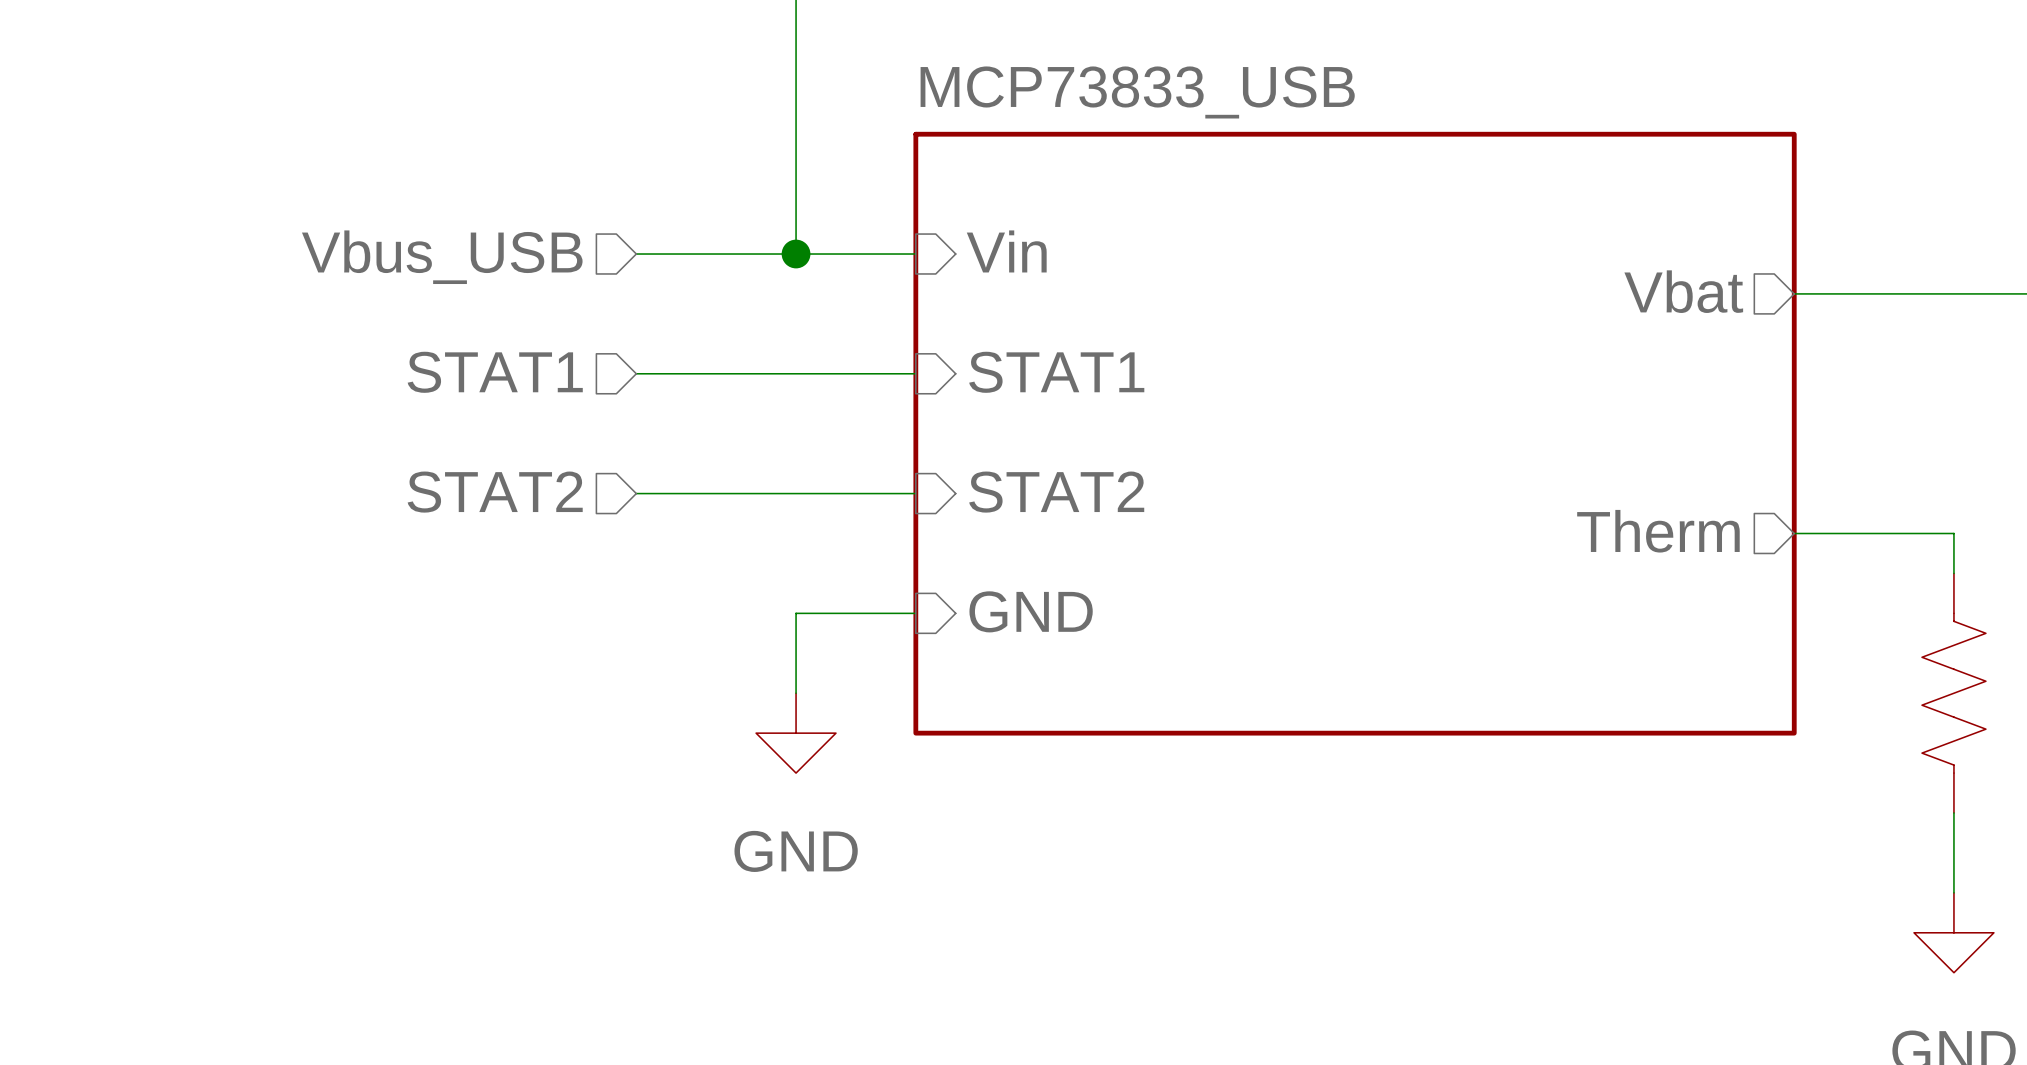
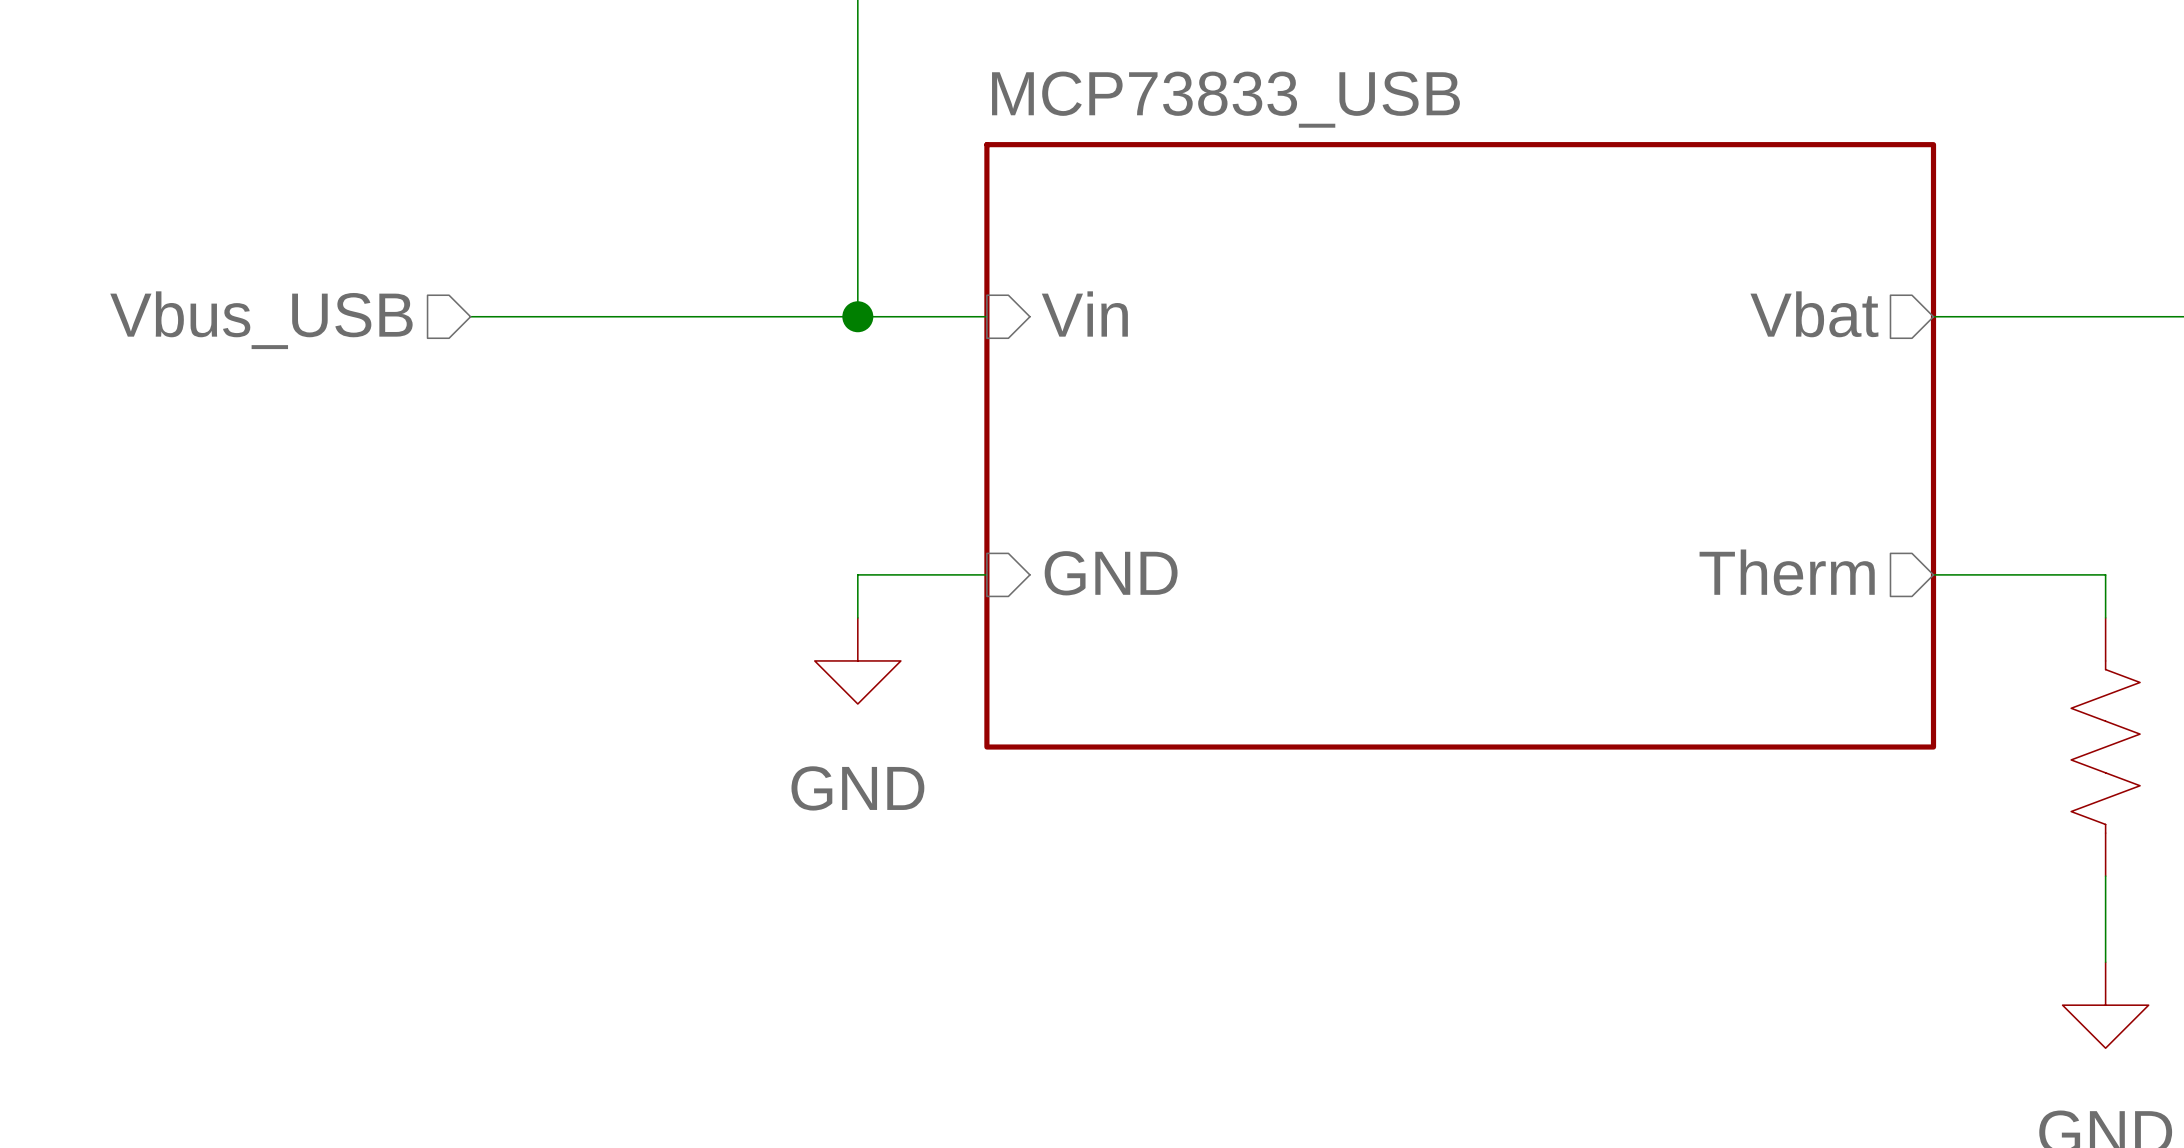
sheet MCP73833_USB shape: [913, 131, 1797, 736] -> [984, 142, 1937, 750]
sheet pin position: Vin (1006, 251) -> Vin (1084, 313)
wire: (636, 254) (915, 254) -> none
wire: none -> (857, 273) (857, 316)
junction position: (796, 254) -> (857, 316)
hierarchical label position: Vbus_USB (442, 257) -> Vbus_USB (261, 320)
wire: none -> (470, 316) (986, 316)
hierarchical label: STAT1 (495, 372) -> none
sheet pin: STAT1 (1056, 372) -> none
wire: (636, 373) (915, 373) -> none
hierarchical label: STAT2 (495, 492) -> none
sheet pin: STAT2 (1056, 492) -> none
wire: (636, 493) (915, 493) -> none
wire: none -> (986, 574) (857, 574) (857, 617)
sheet pin position: GND (1031, 611) -> GND (1111, 573)
wire: (915, 613) (796, 613) (796, 693) -> none
power symbol position: GND (796, 733) -> GND (857, 660)

